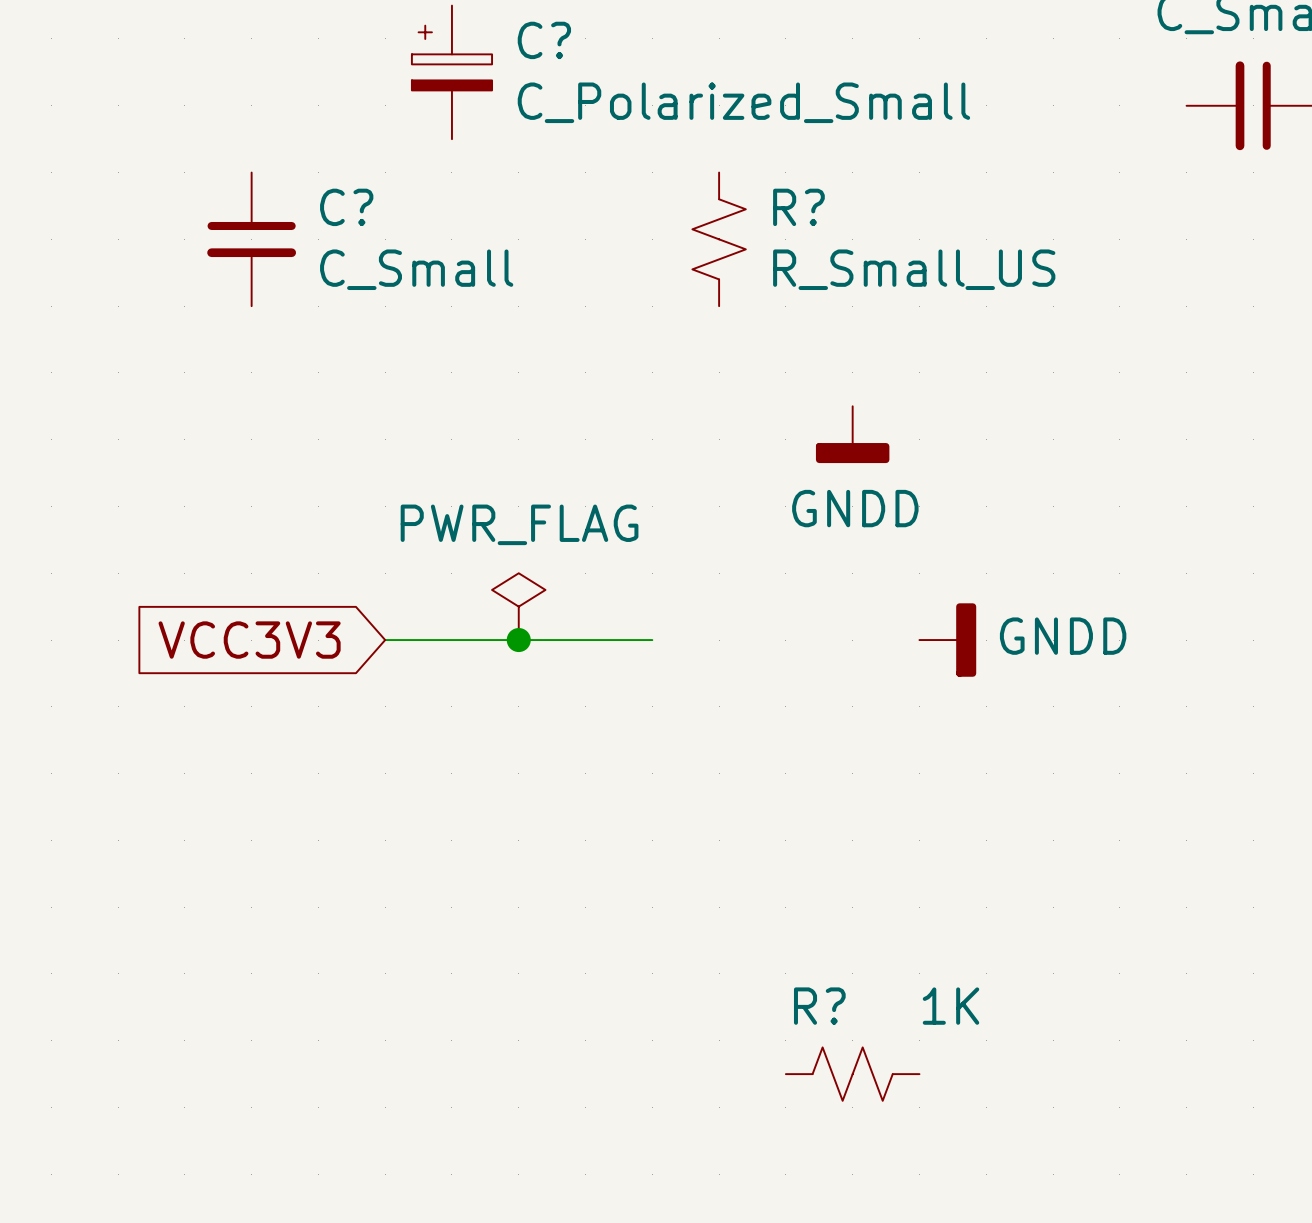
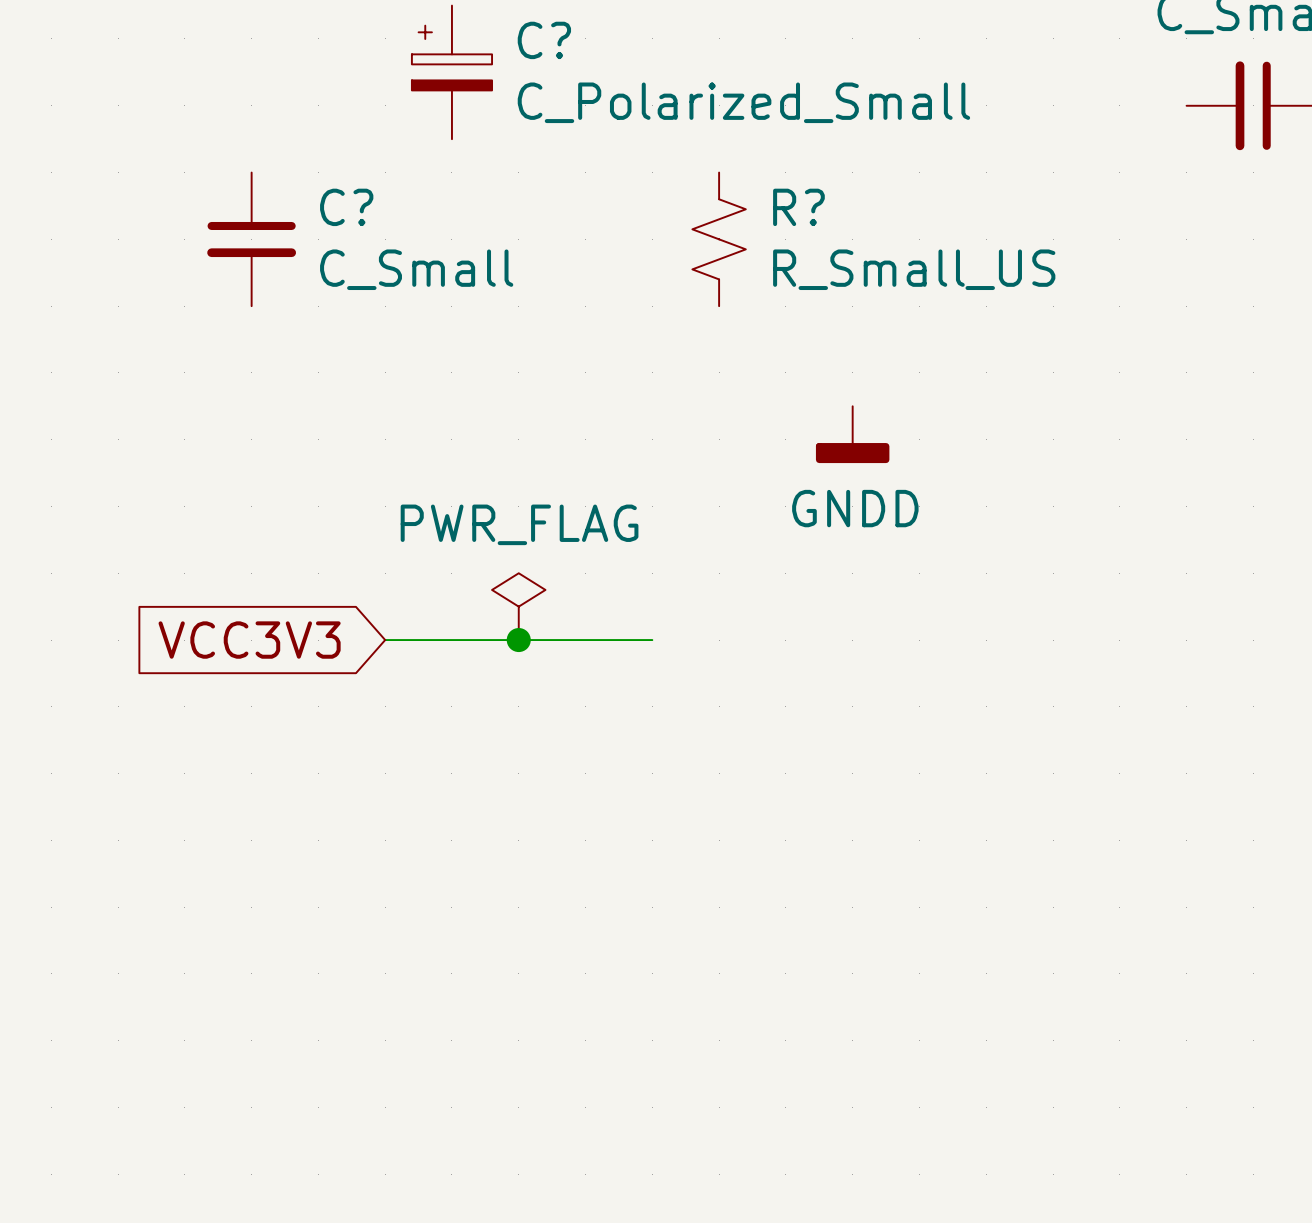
power symbol: GNDD (947, 640) -> none
R?: 1K (852, 1074) -> none

